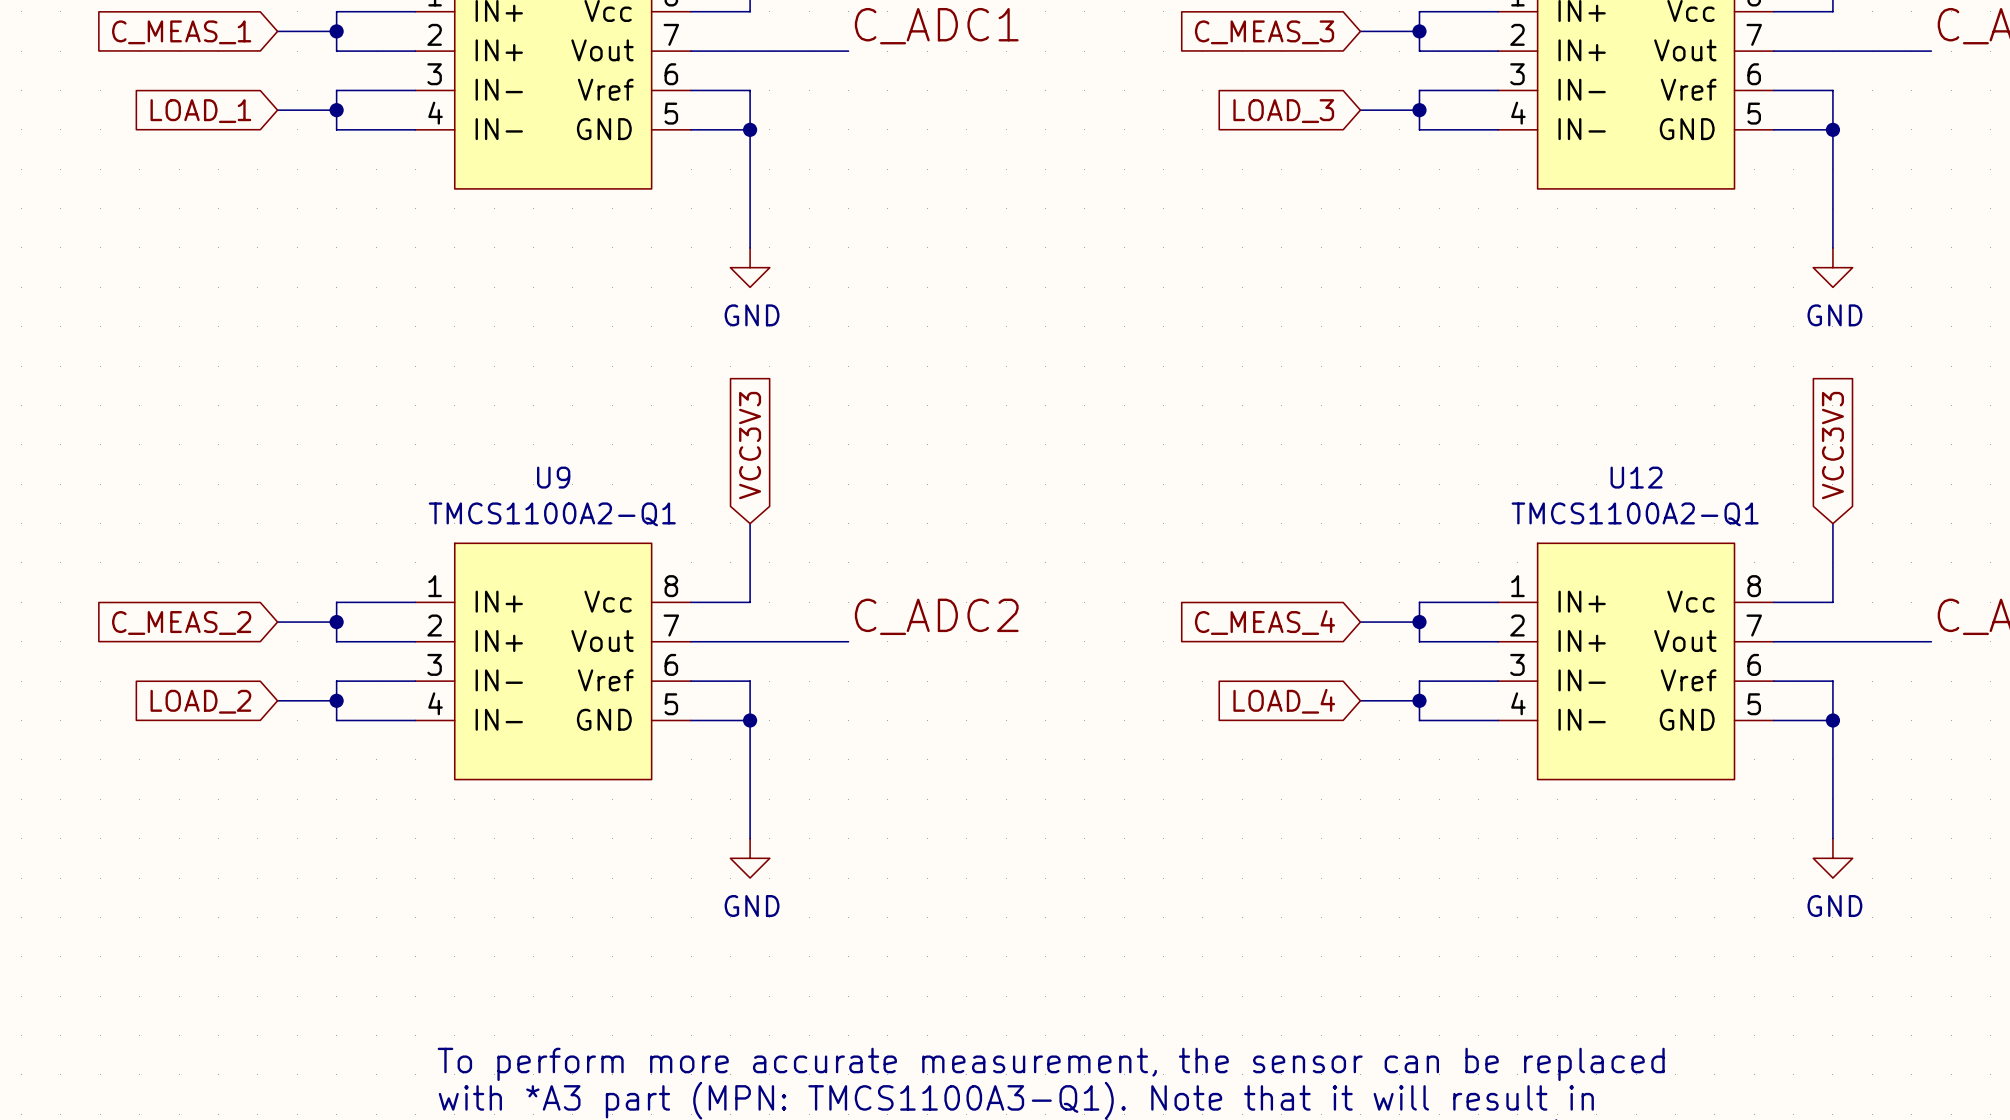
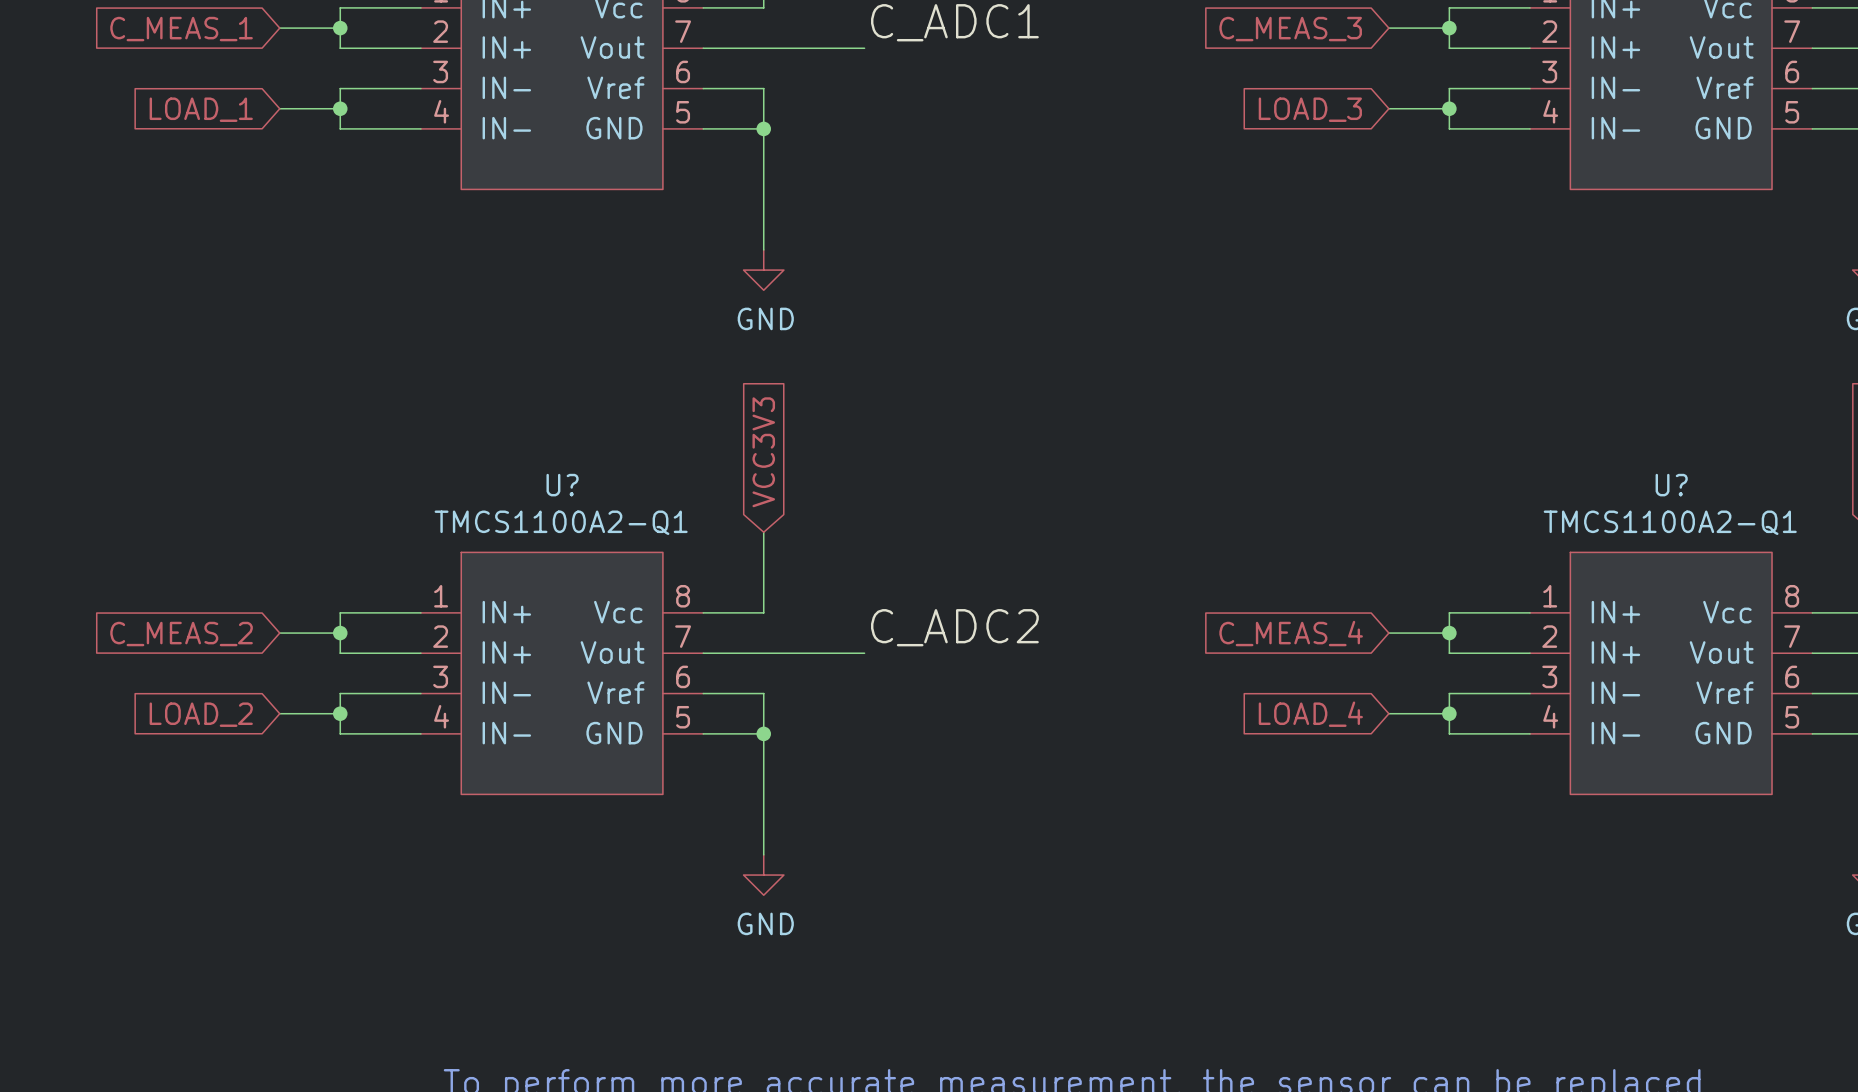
U9 name: U9 (553, 477) -> U? (562, 485)
U12 name: U12 (1636, 477) -> U? (1671, 485)

